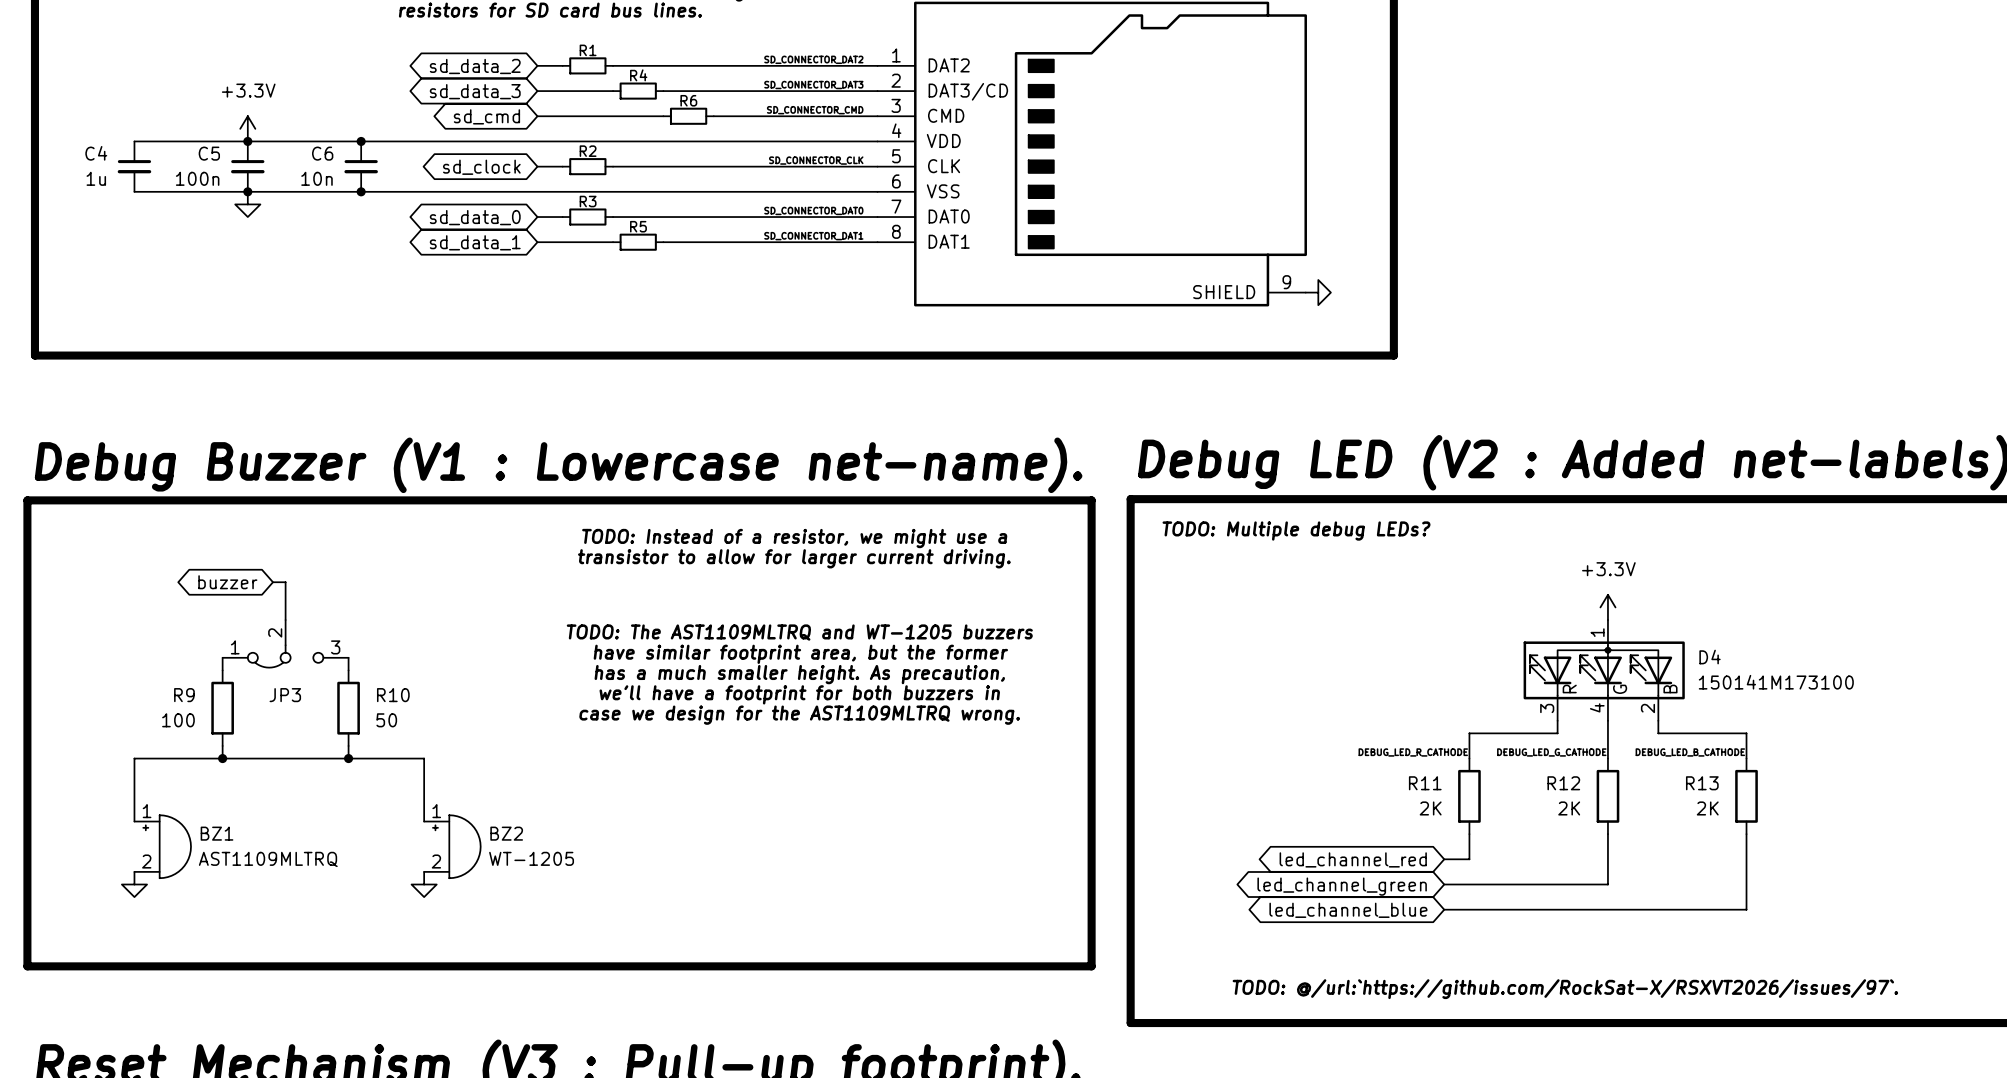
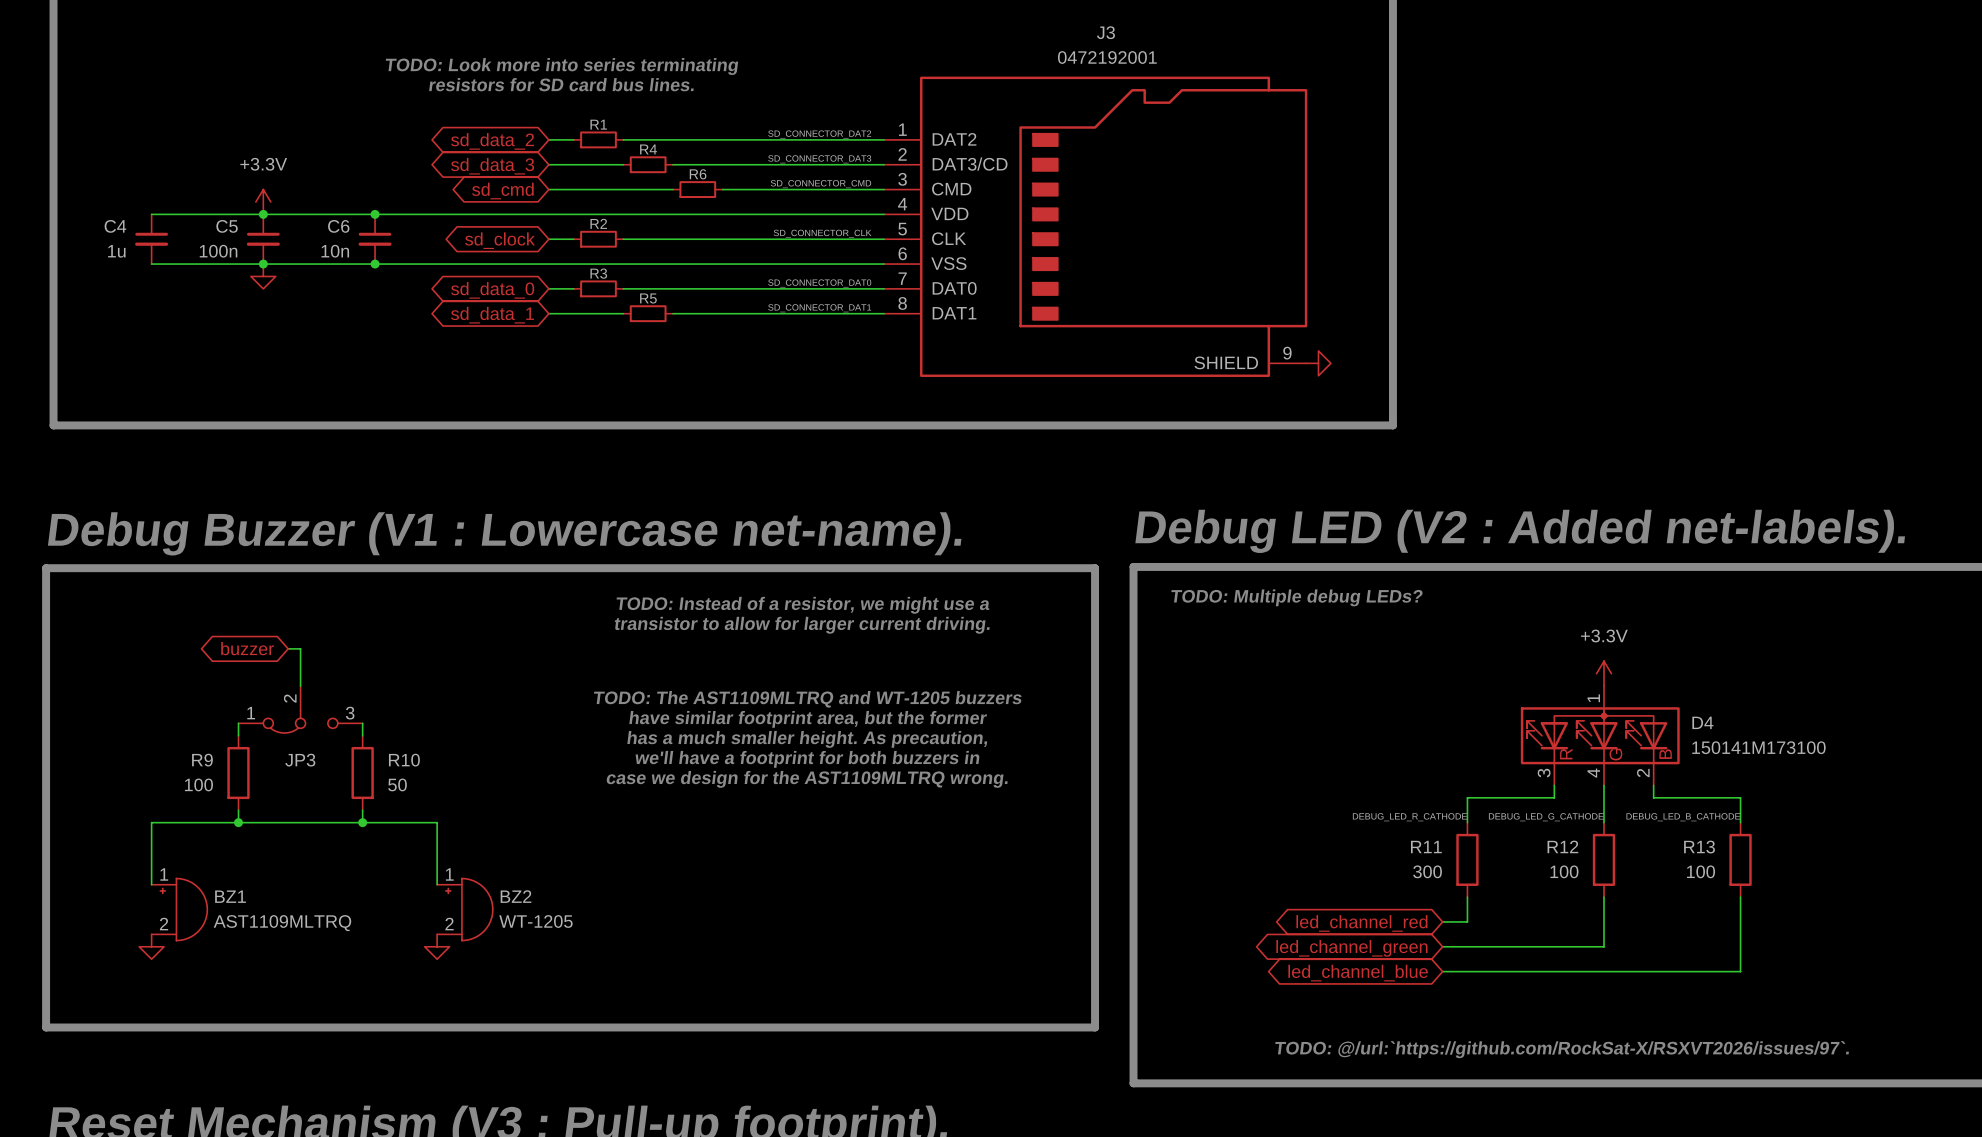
R11 value: 2K (1430, 808) -> 300 (1427, 871)
R12 value: 2K (1569, 808) -> 100 (1564, 871)
R13 value: 2K (1707, 808) -> 100 (1701, 871)

